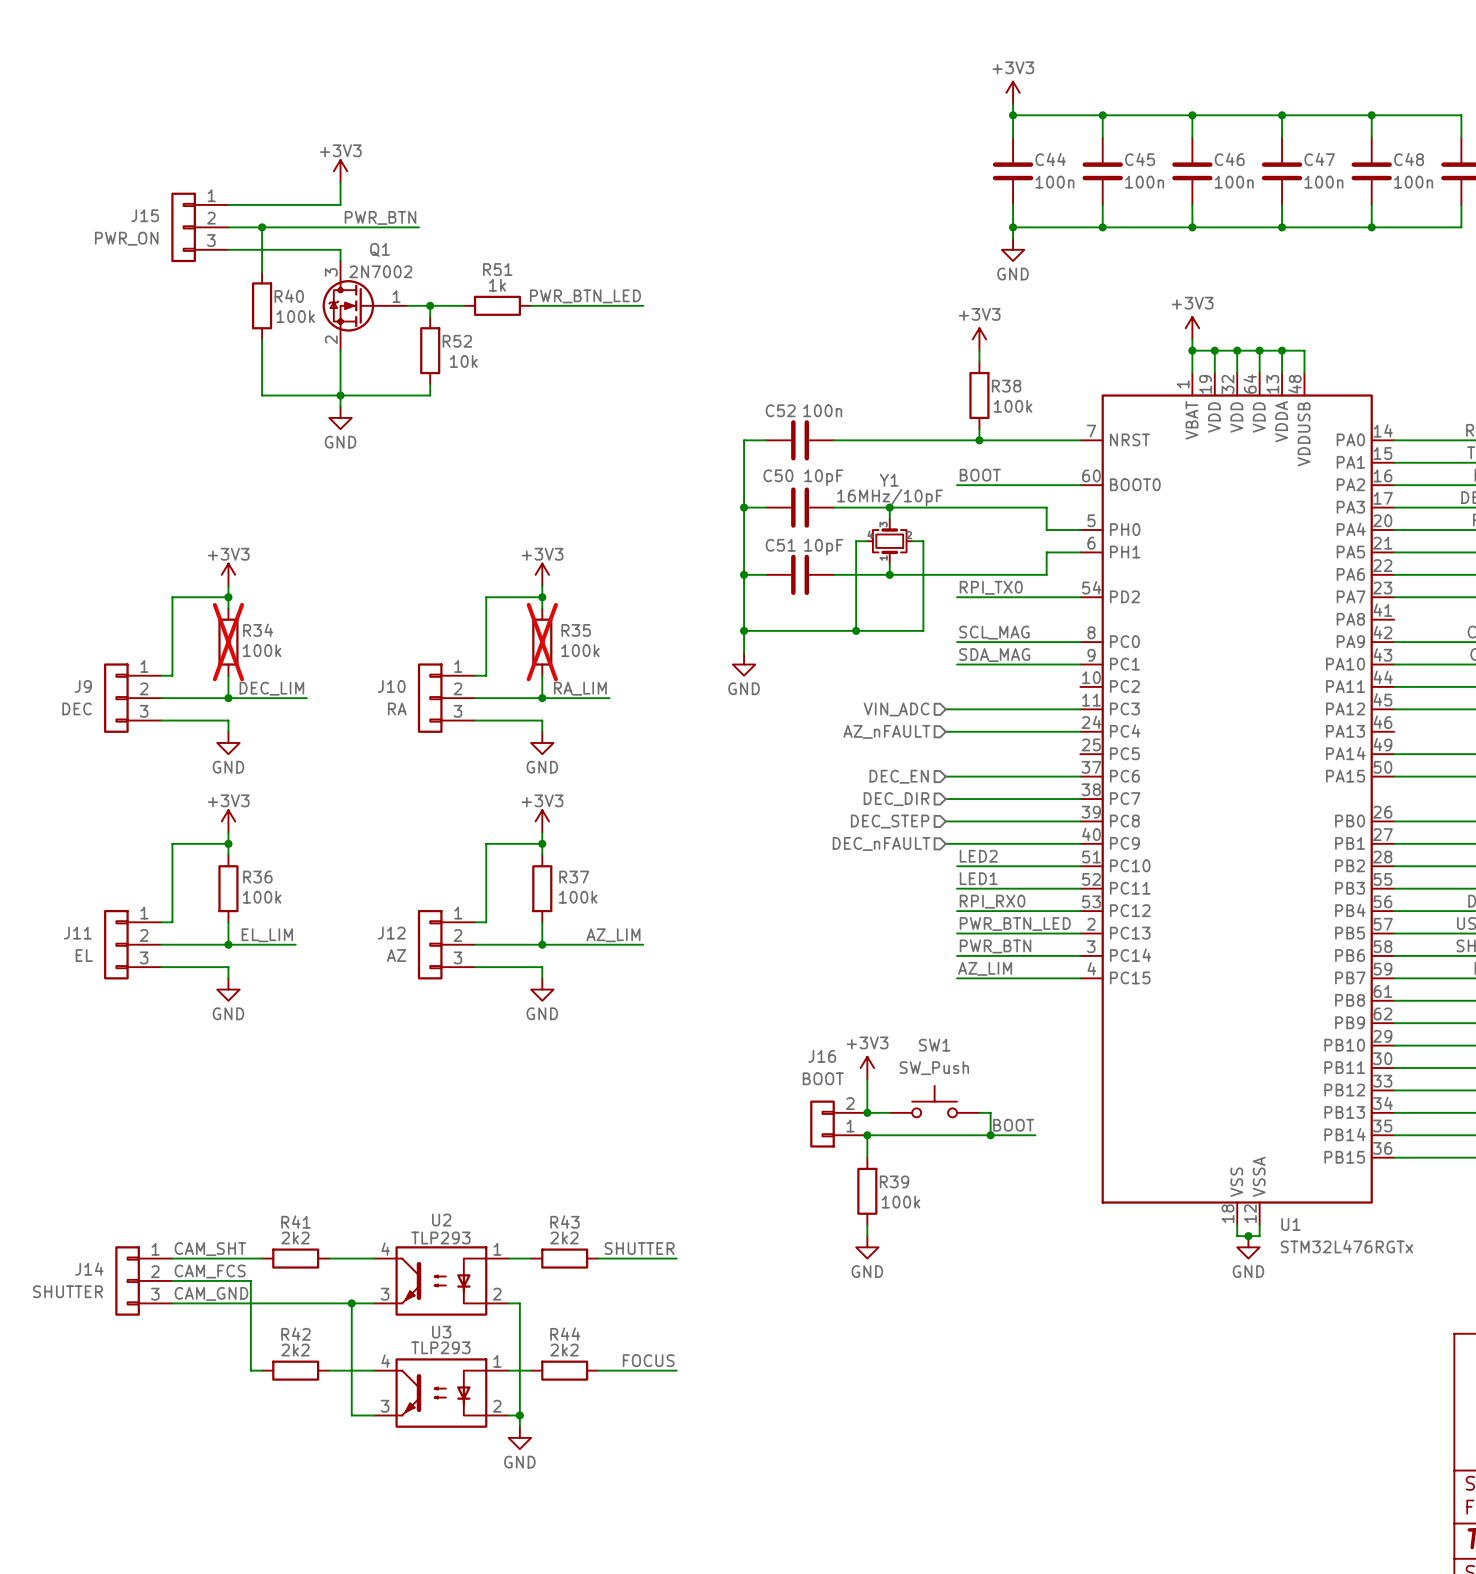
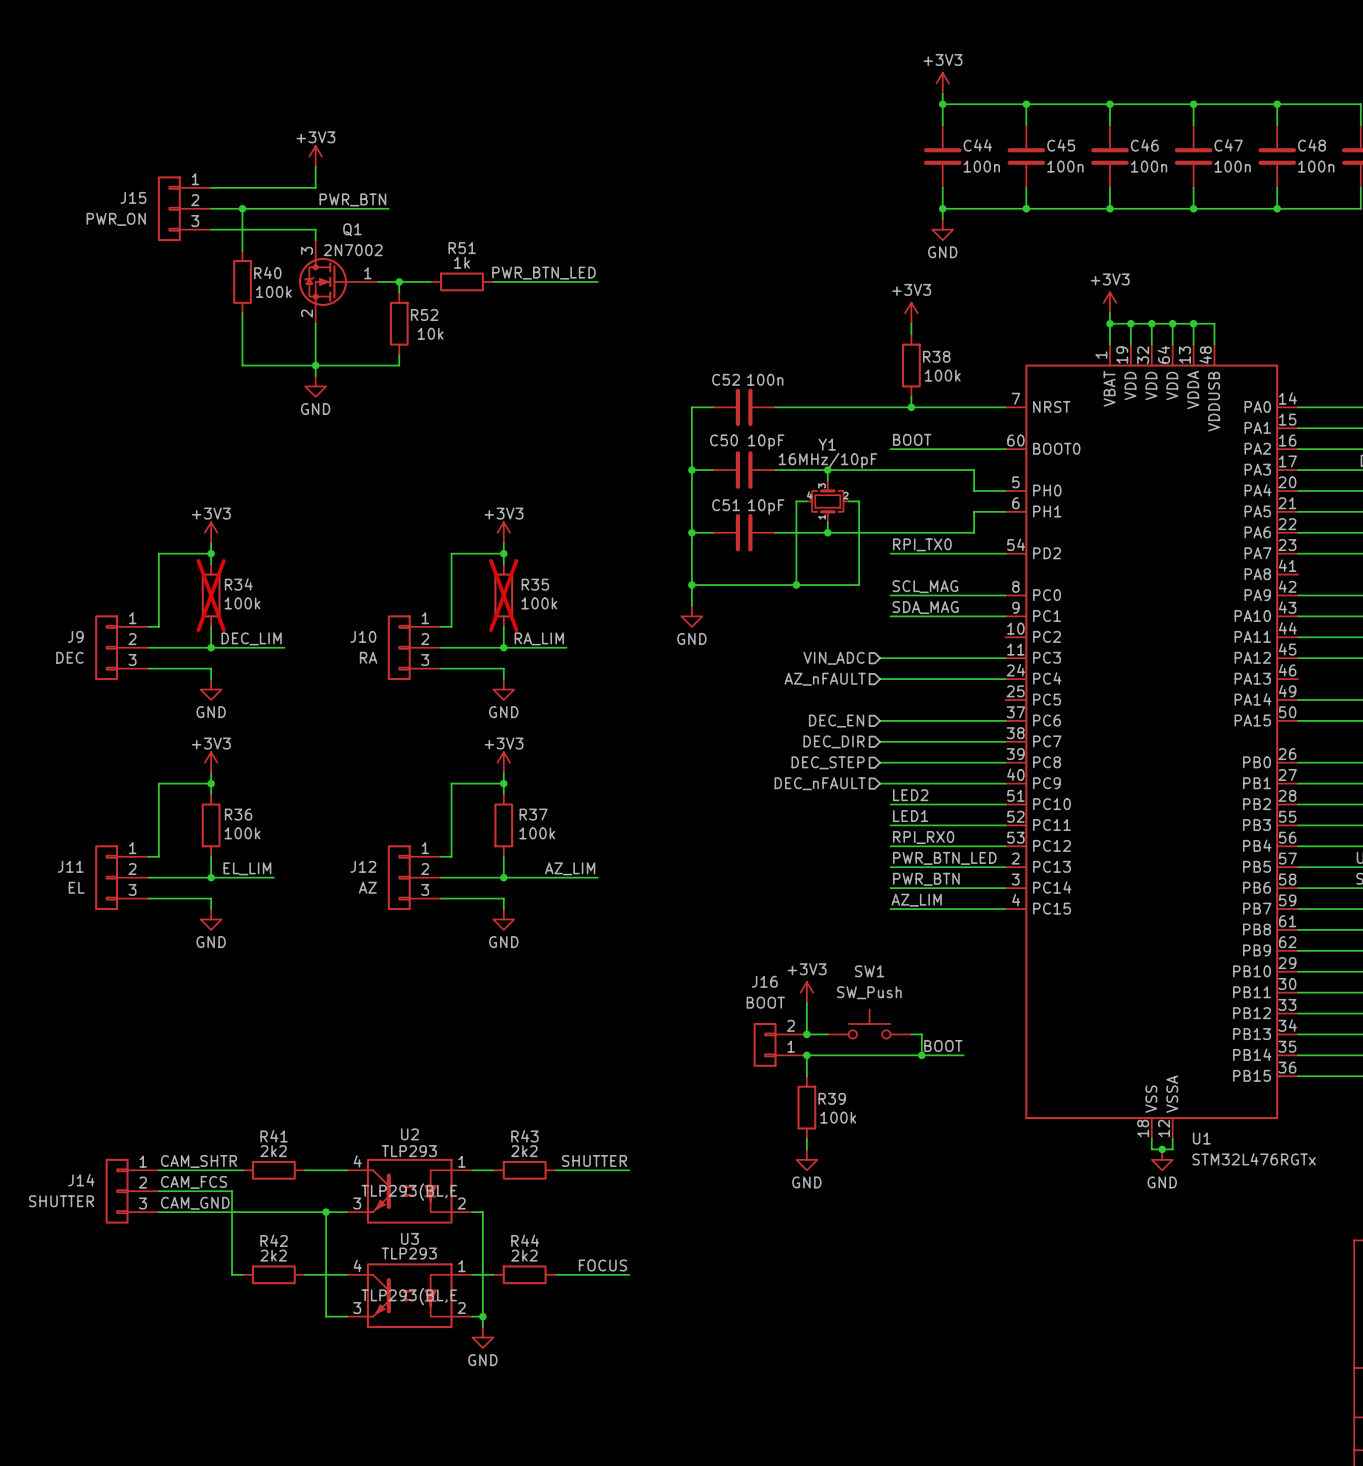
label: CAM_SHT (210, 1249) -> CAM_SHTR (199, 1161)
U2 text: none -> TLP293(BL,E (409, 1192)
U3 text: none -> TLP293(BL,E (409, 1296)

